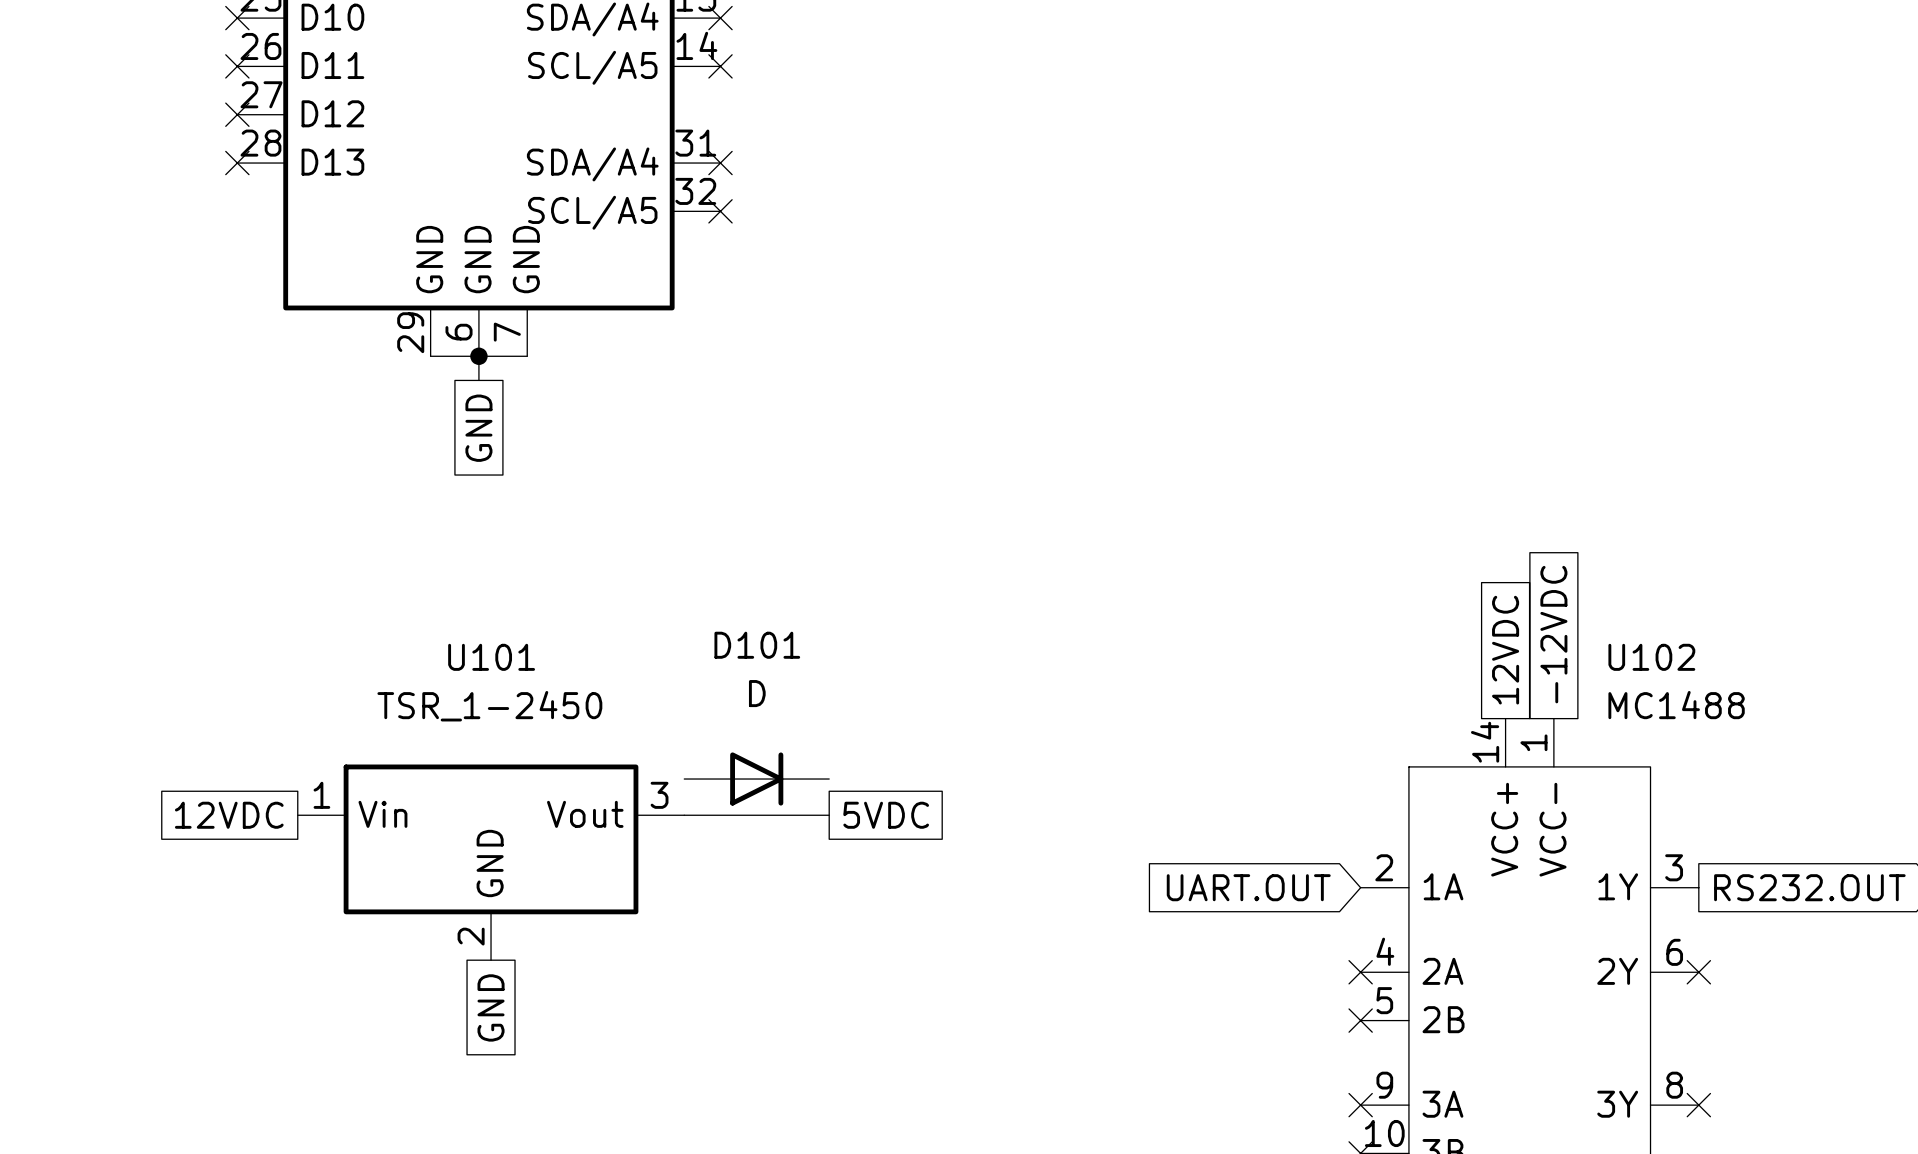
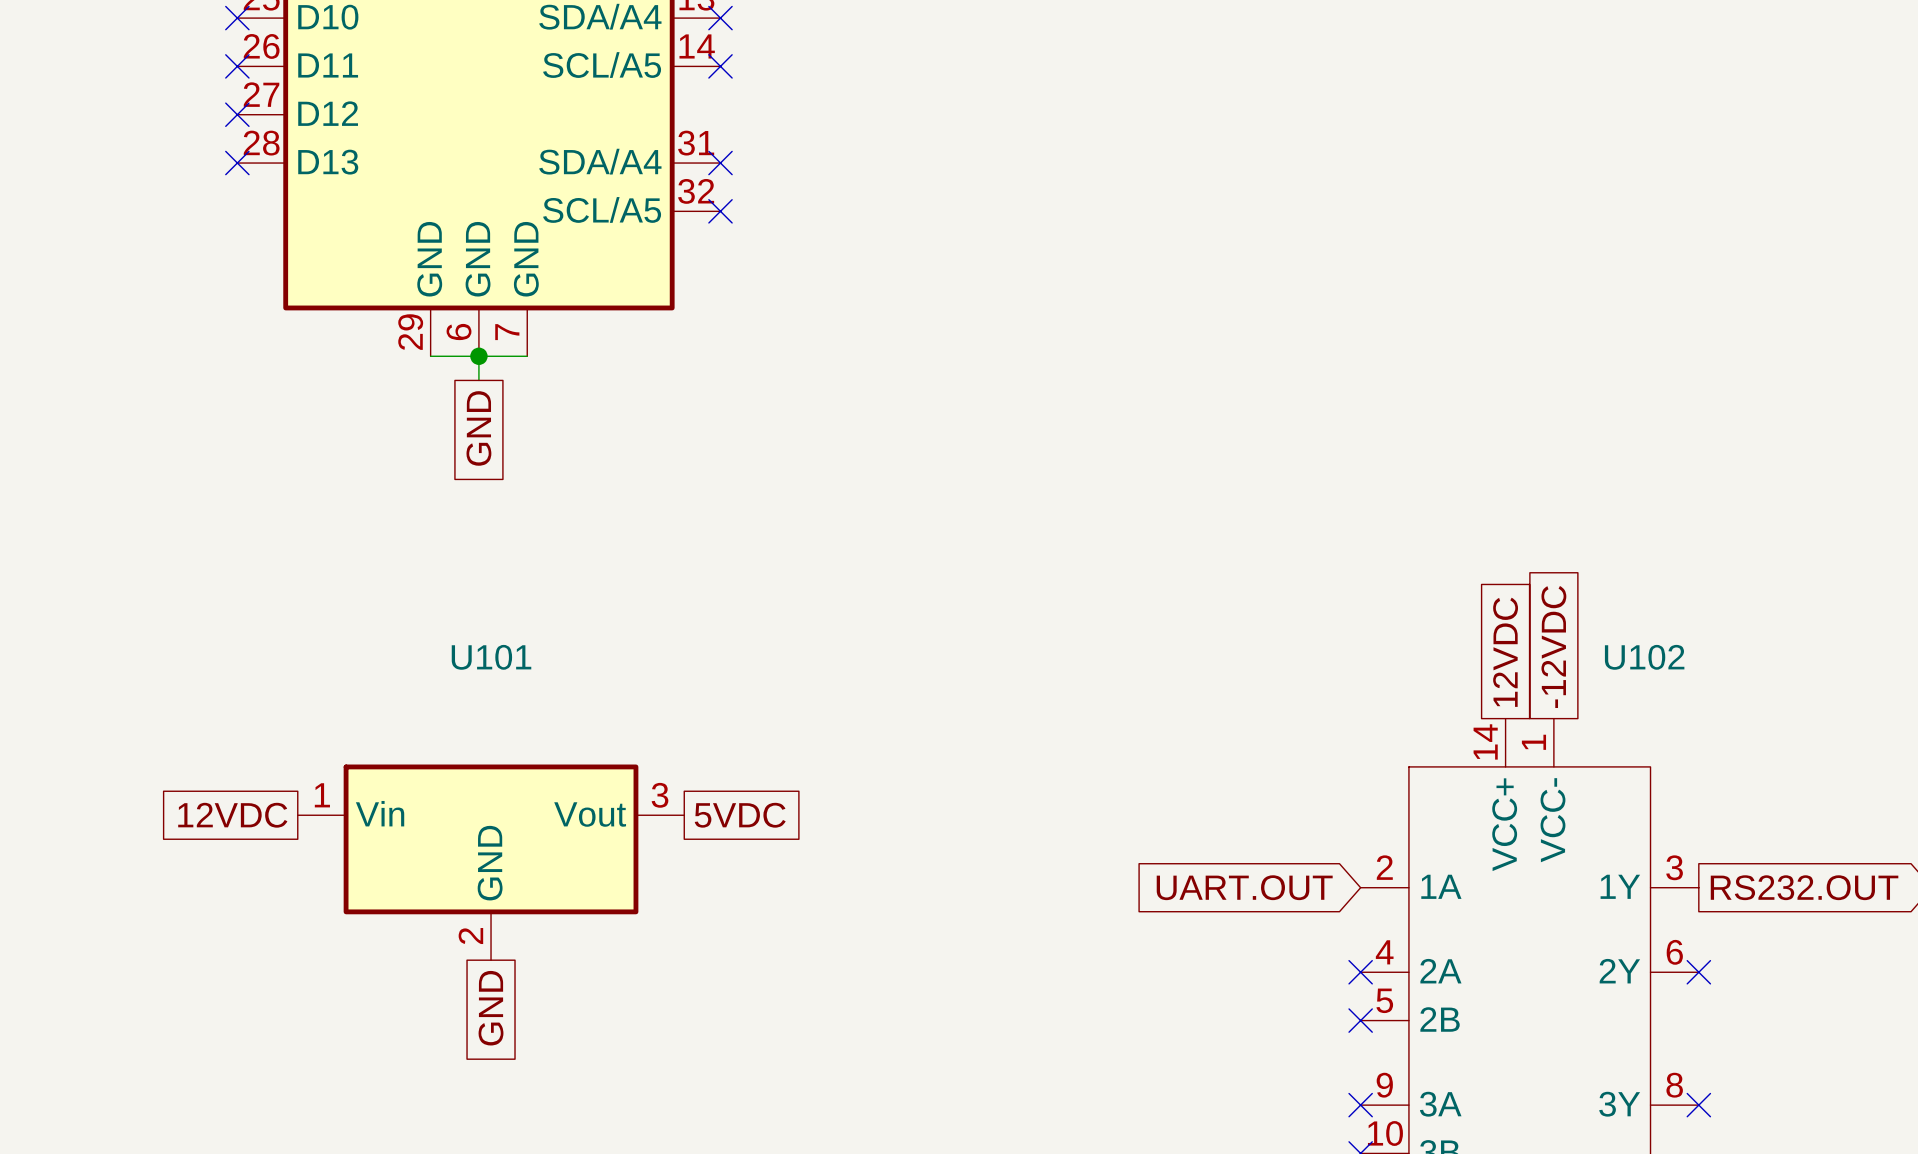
U102 value: MC1488 (1676, 705) -> none
U101 value: TSR_1-2450 (489, 706) -> none
D101: D (756, 779) -> none
wire: (684, 815) (829, 815) -> none
global label position: 5VDC (886, 815) -> 5VDC (740, 815)

